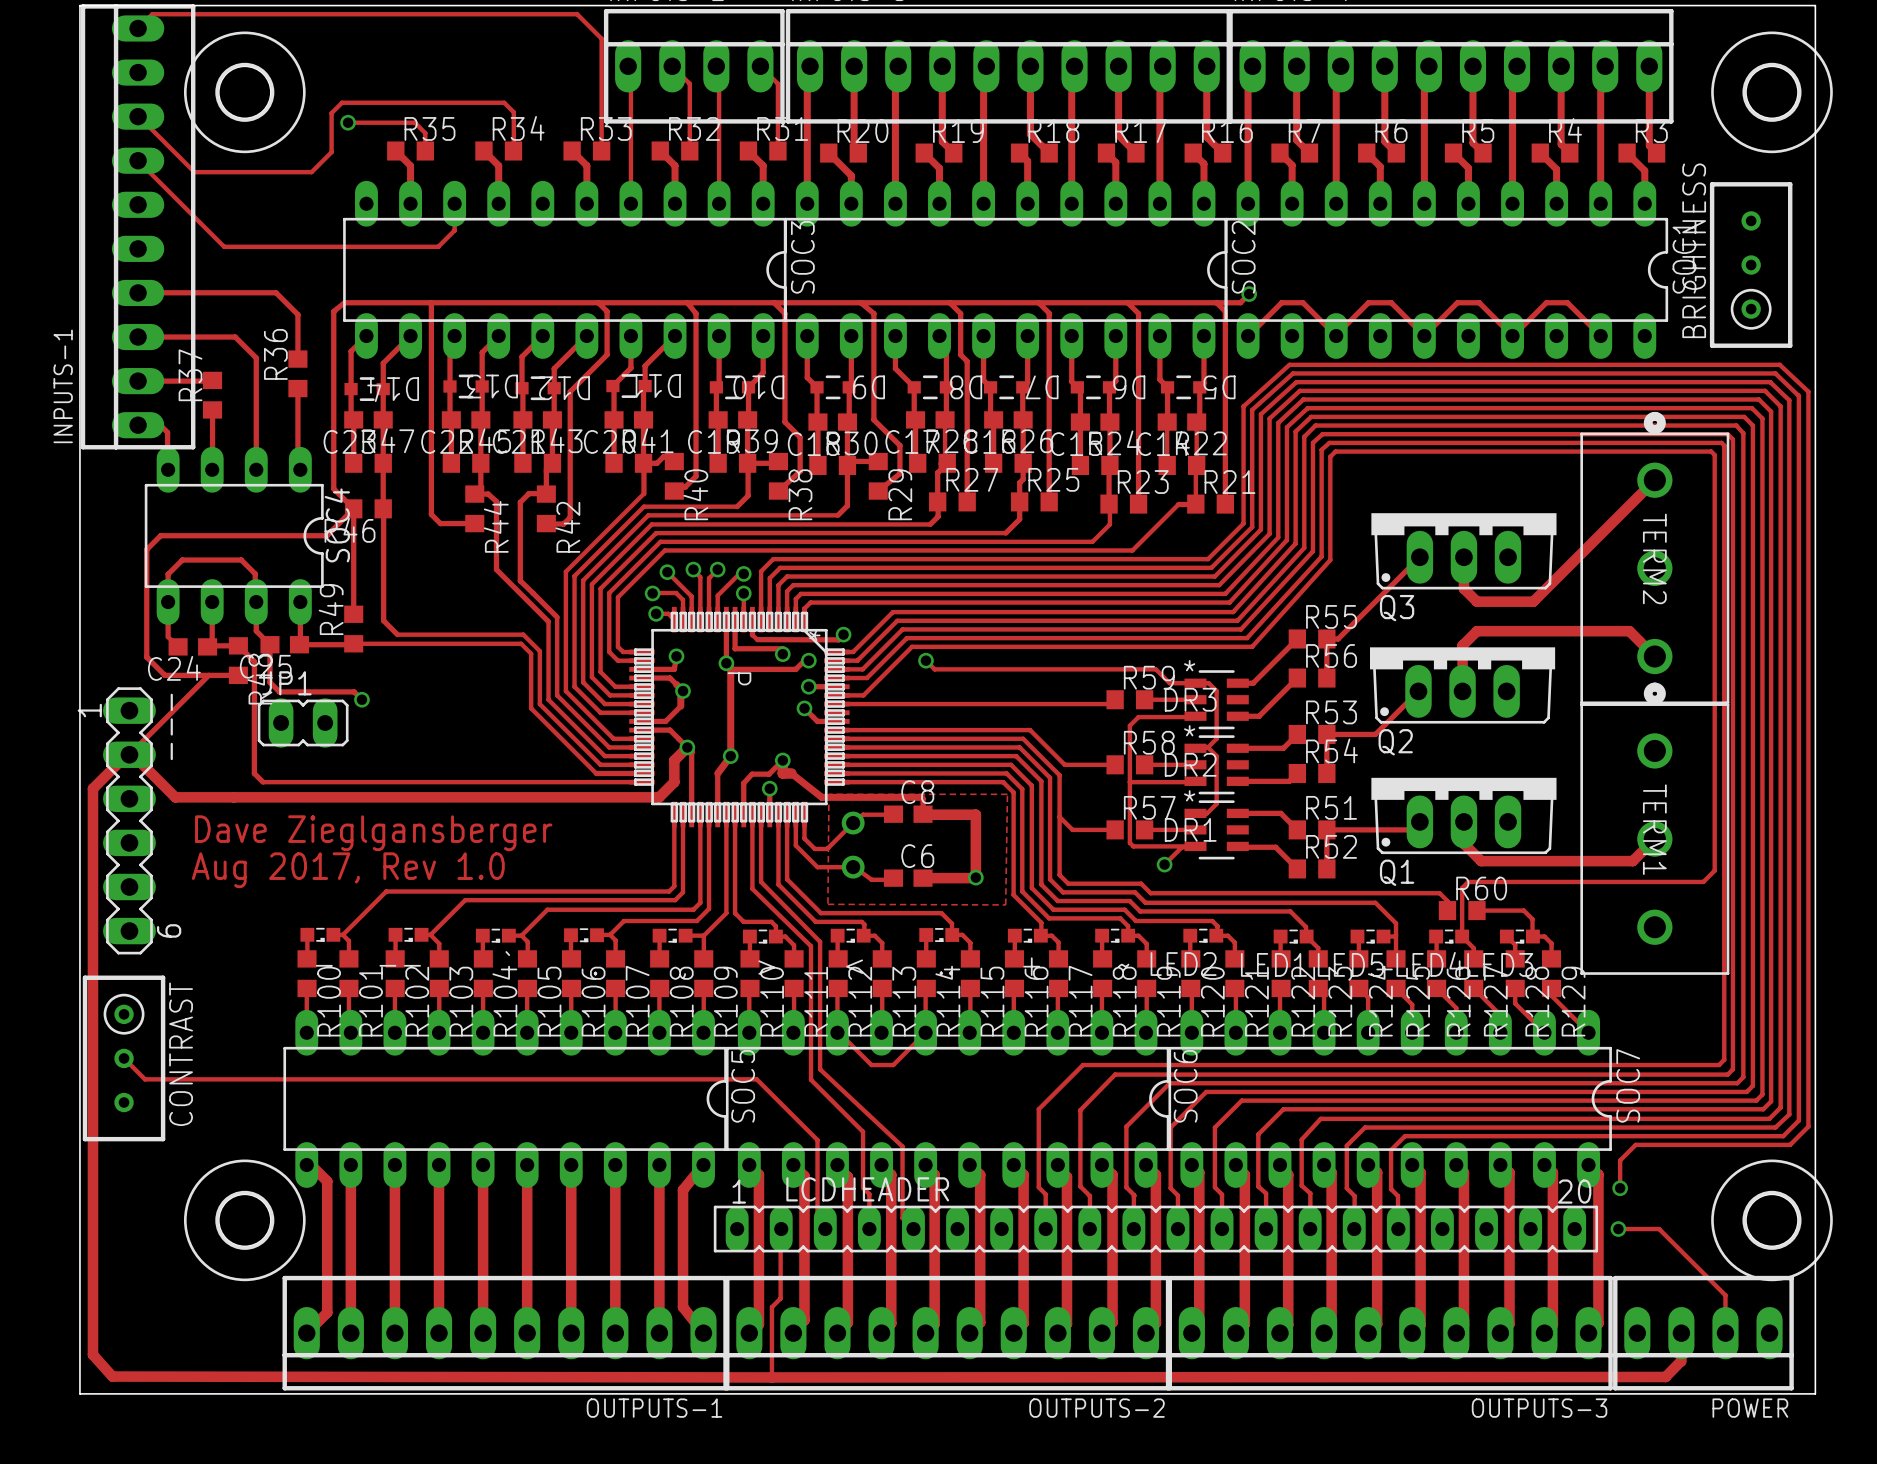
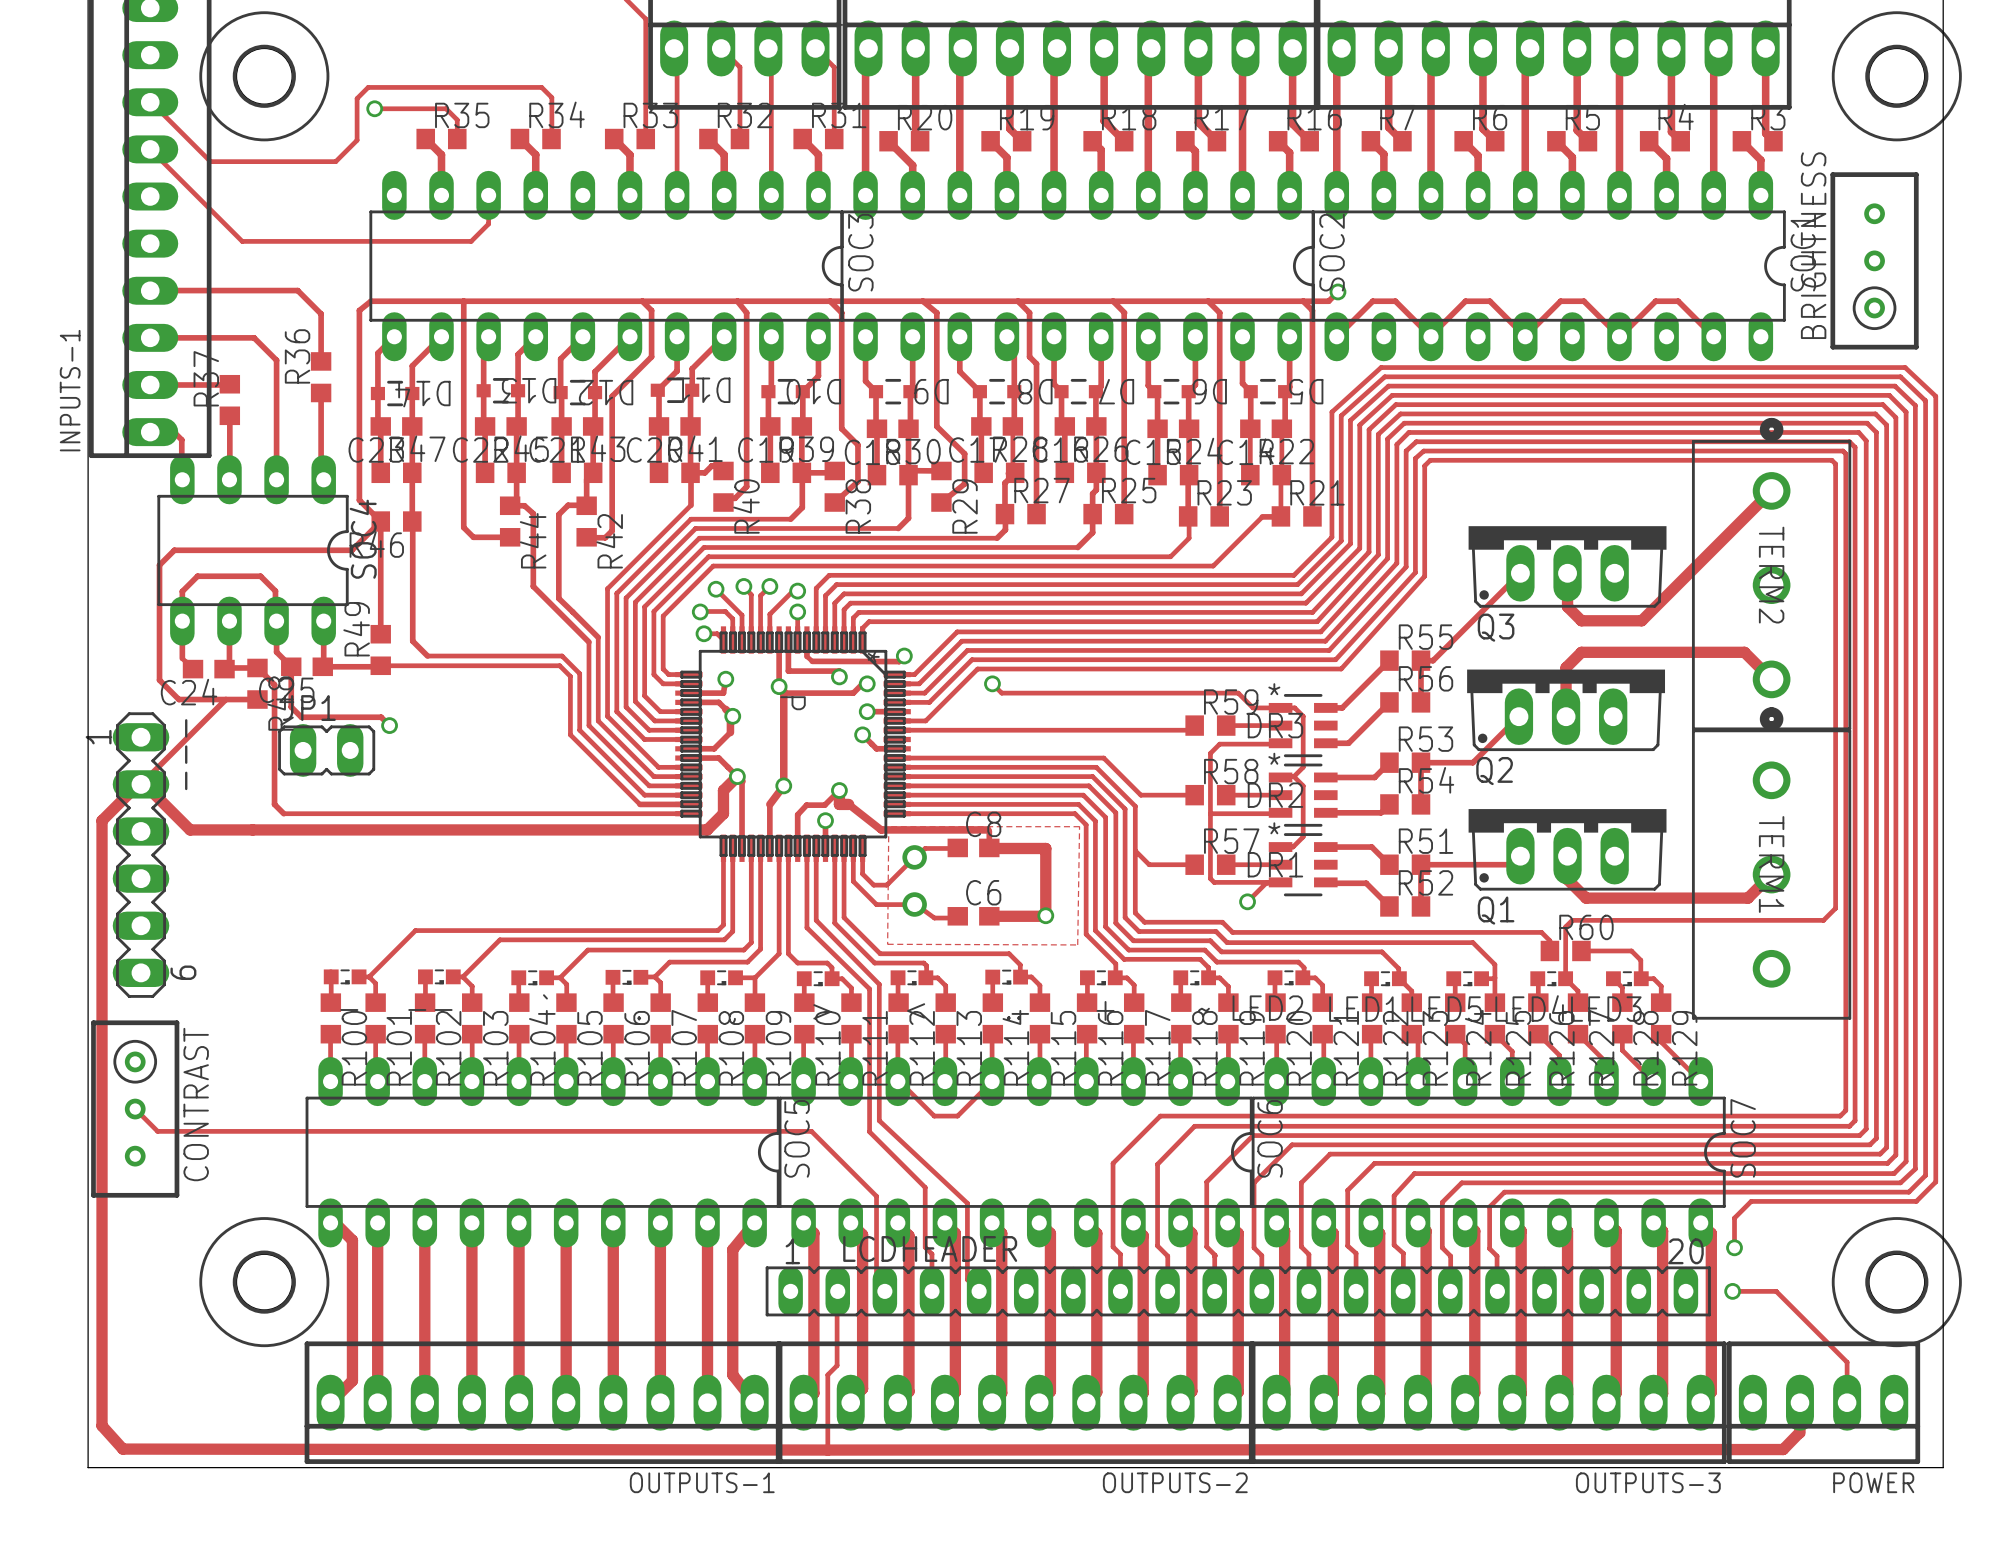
text: Dave Zieglgansberger (373, 833) -> none
text: Aug 2017, Rev 1.0 (348, 870) -> none

